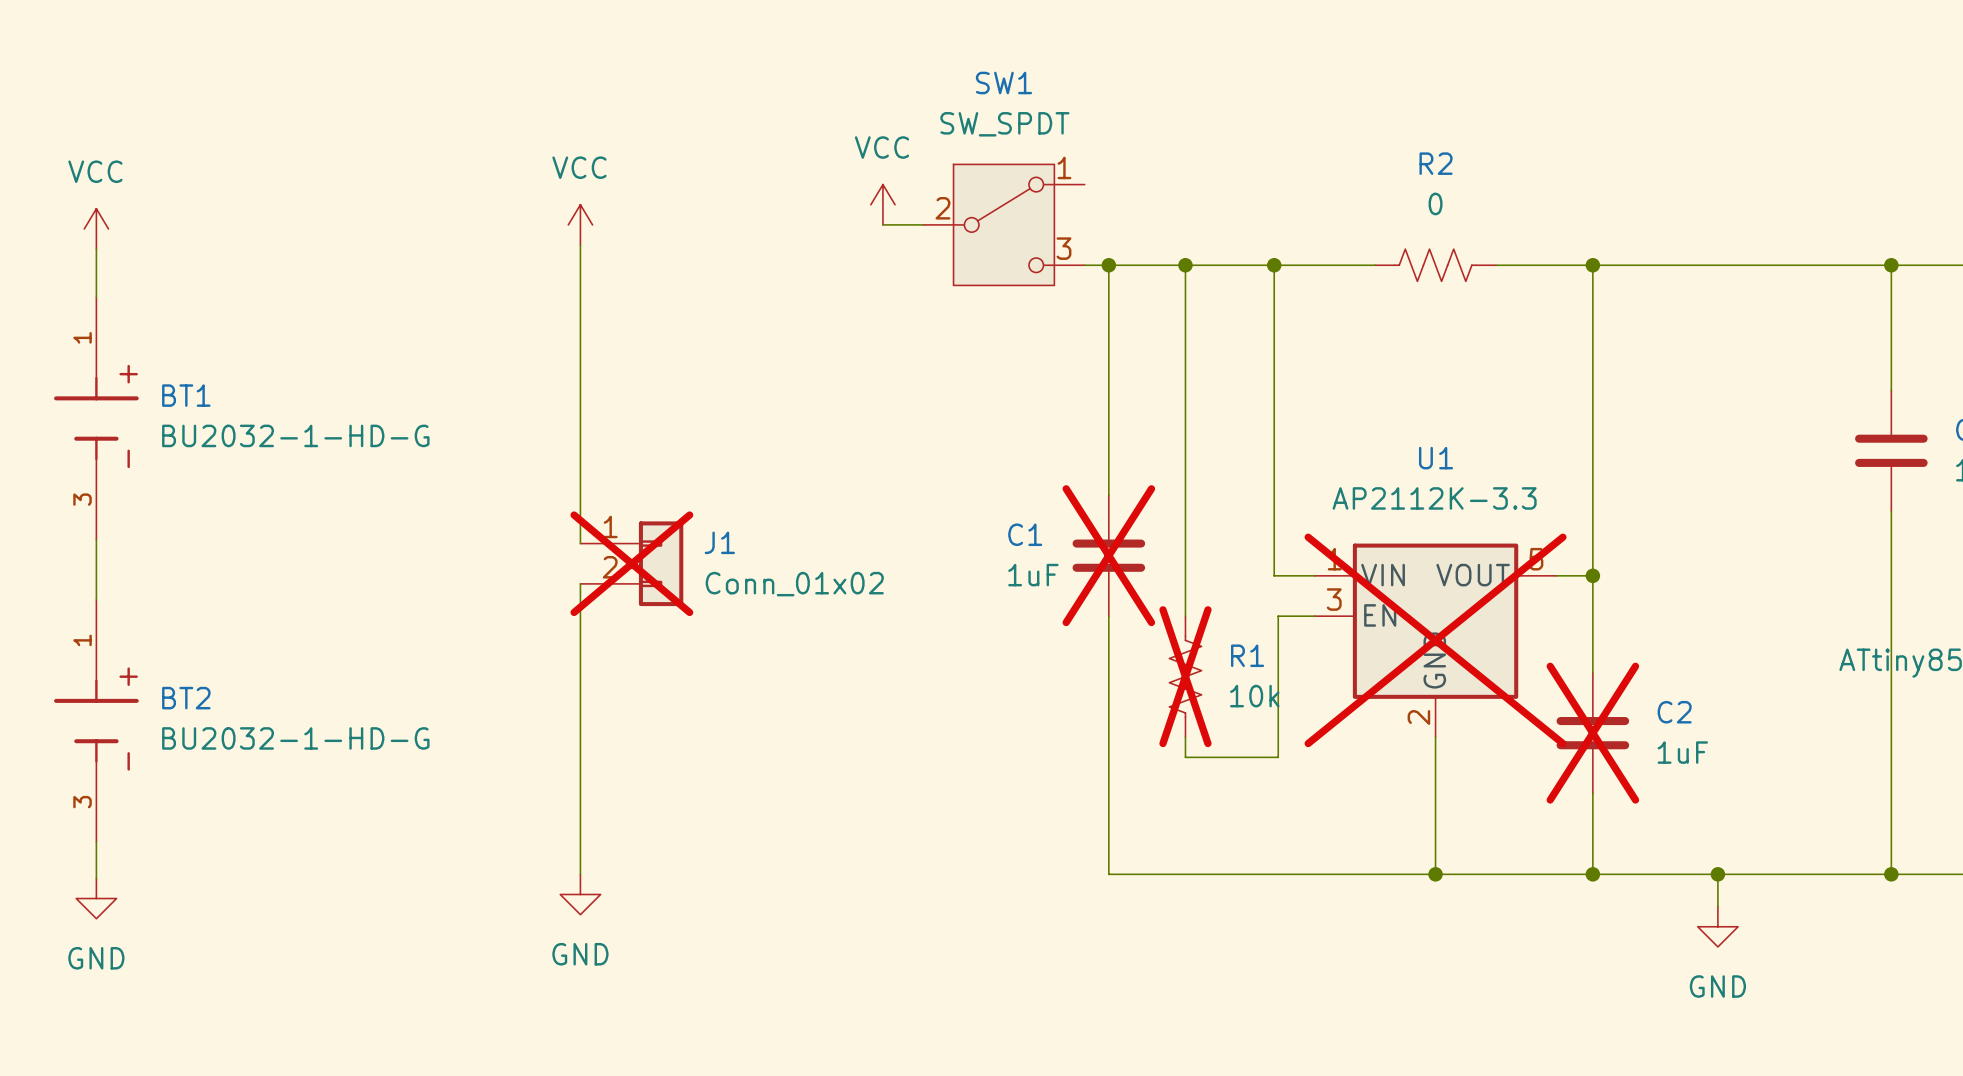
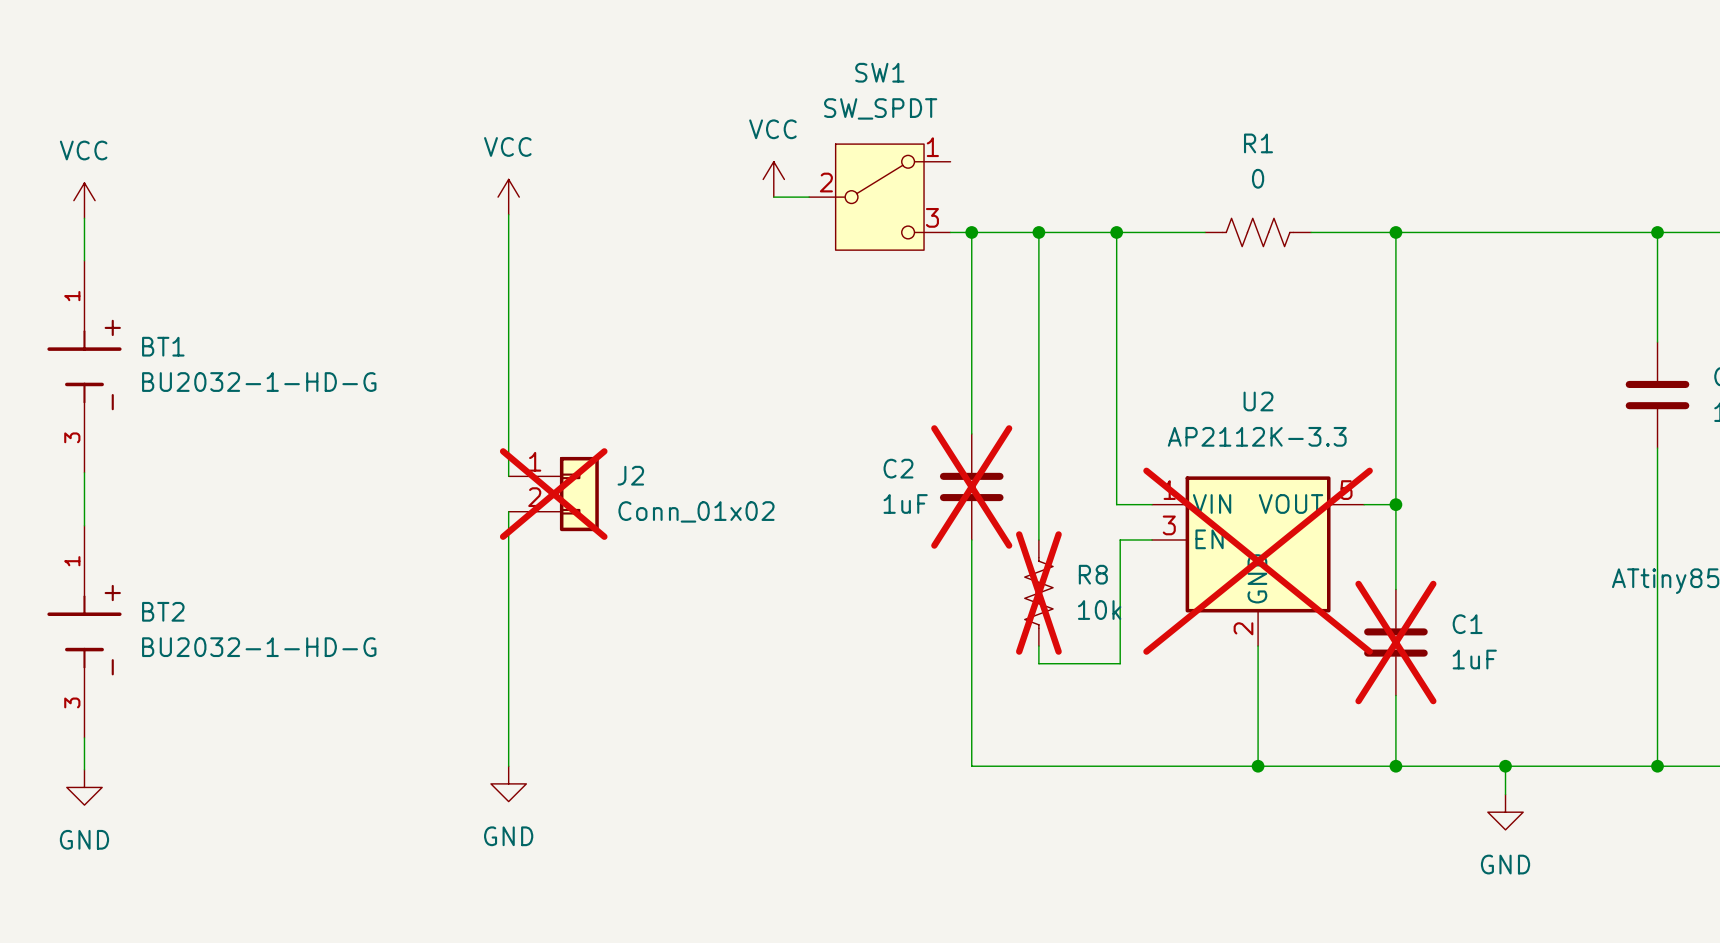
R2 name: R2 (1436, 163) -> R1 (1258, 143)
U1 name: U1 (1436, 458) -> U2 (1258, 401)
C1 name: C1 (1025, 534) -> C2 (898, 468)
J1 name: J1 (719, 542) -> J2 (630, 475)
R1 name: R1 (1247, 655) -> R8 (1093, 574)
C2 name: C2 (1674, 712) -> C1 (1467, 624)

